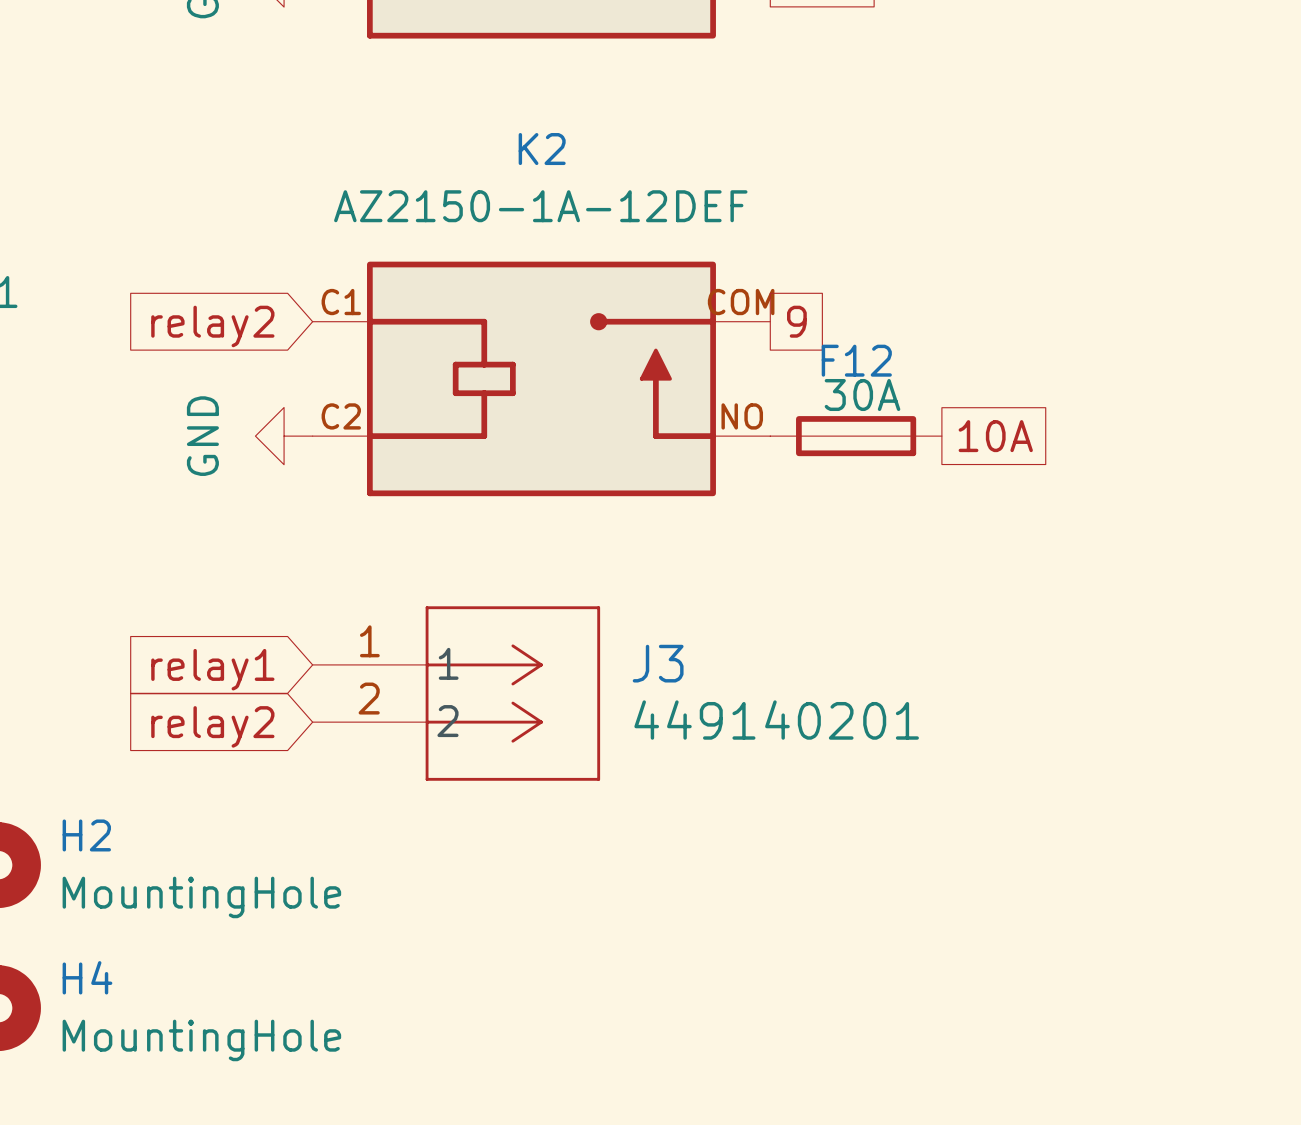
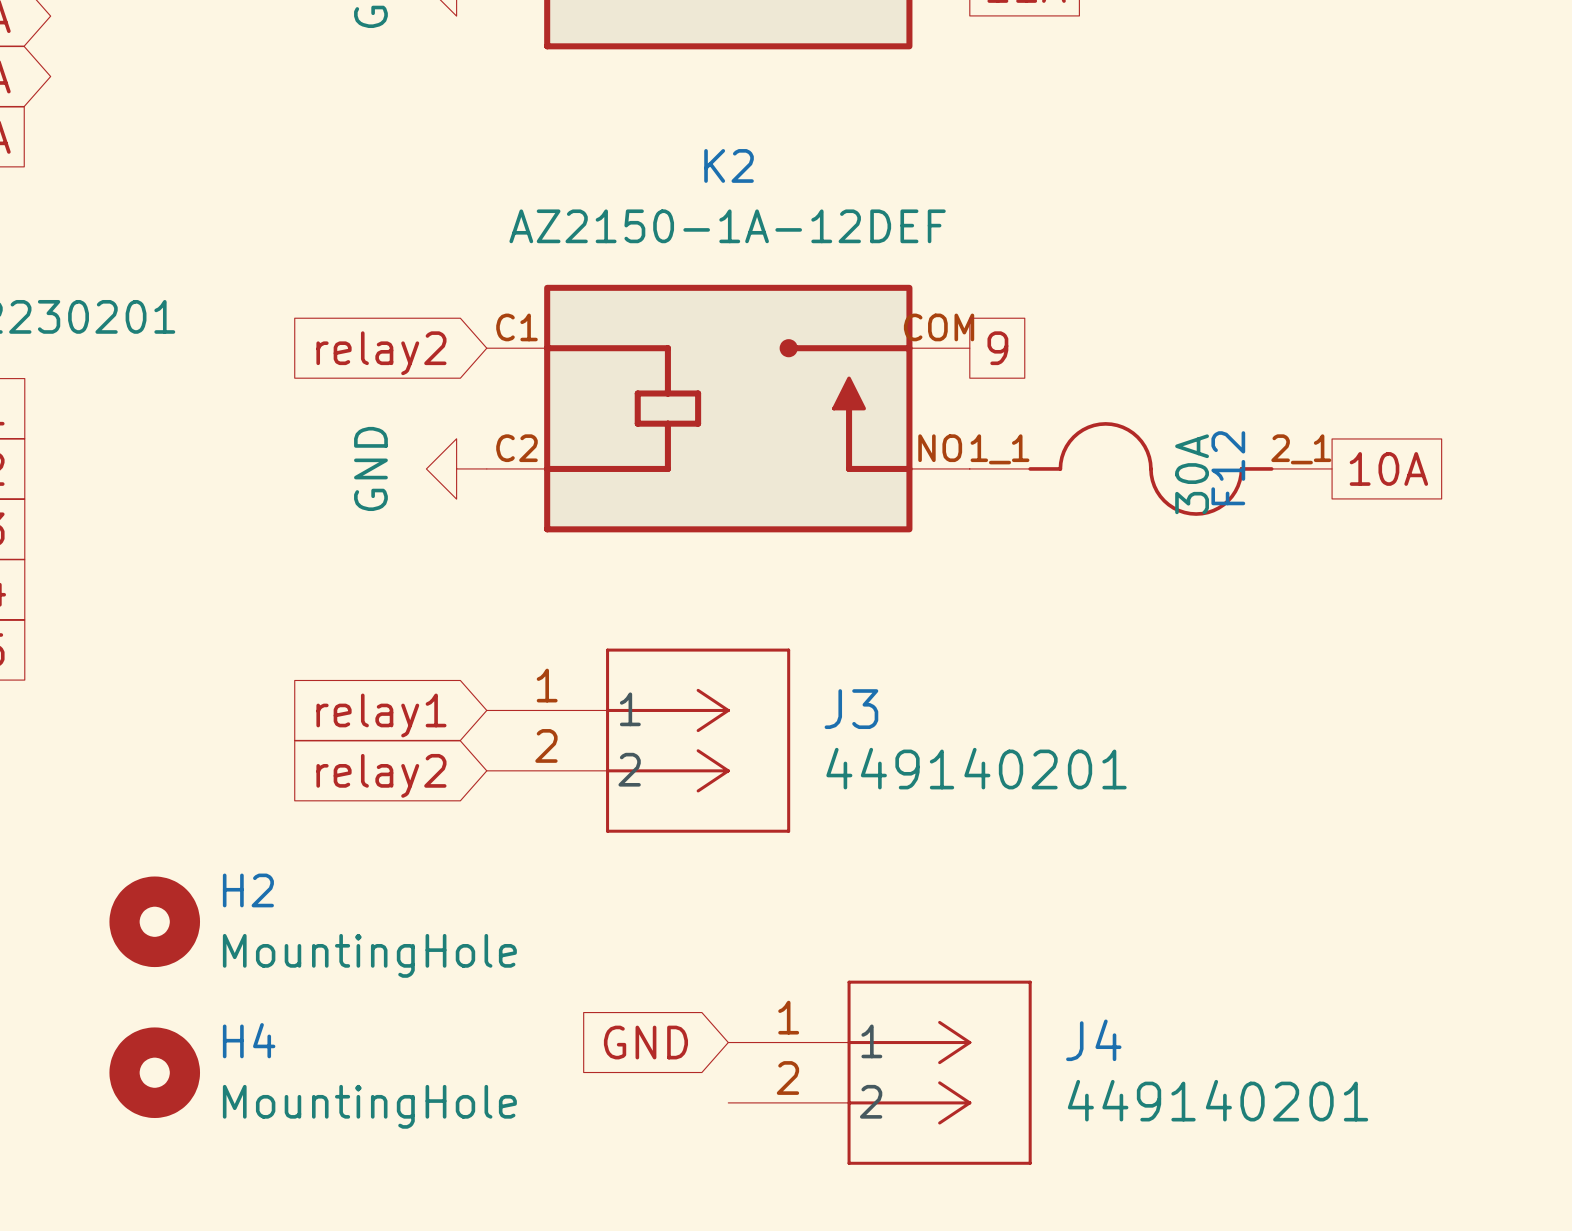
F12 name position: F12 (856, 360) -> F12 (1228, 468)
F12 value position: 30A (862, 395) -> 30A (1192, 474)
F12 symbol: [770, 416, 942, 457] -> [969, 422, 1333, 516]
global label position: 10A (995, 436) -> 10A (1388, 468)
global label: none -> GND (645, 1042)
J4: none -> 449140201 (880, 1072)

